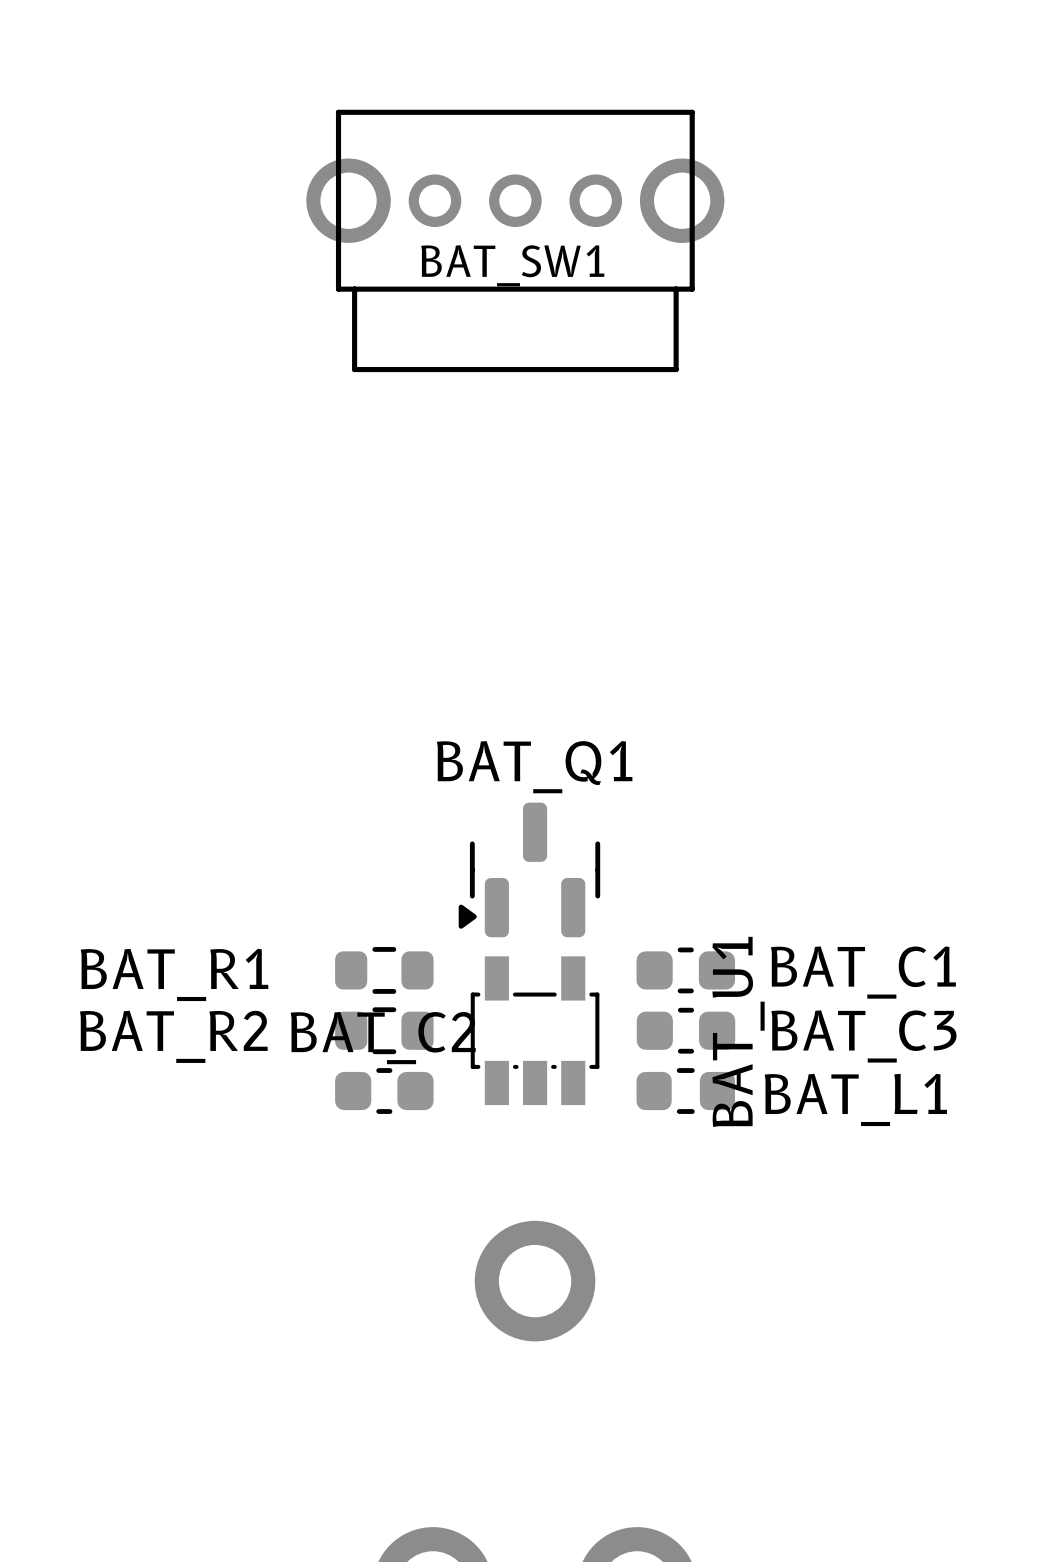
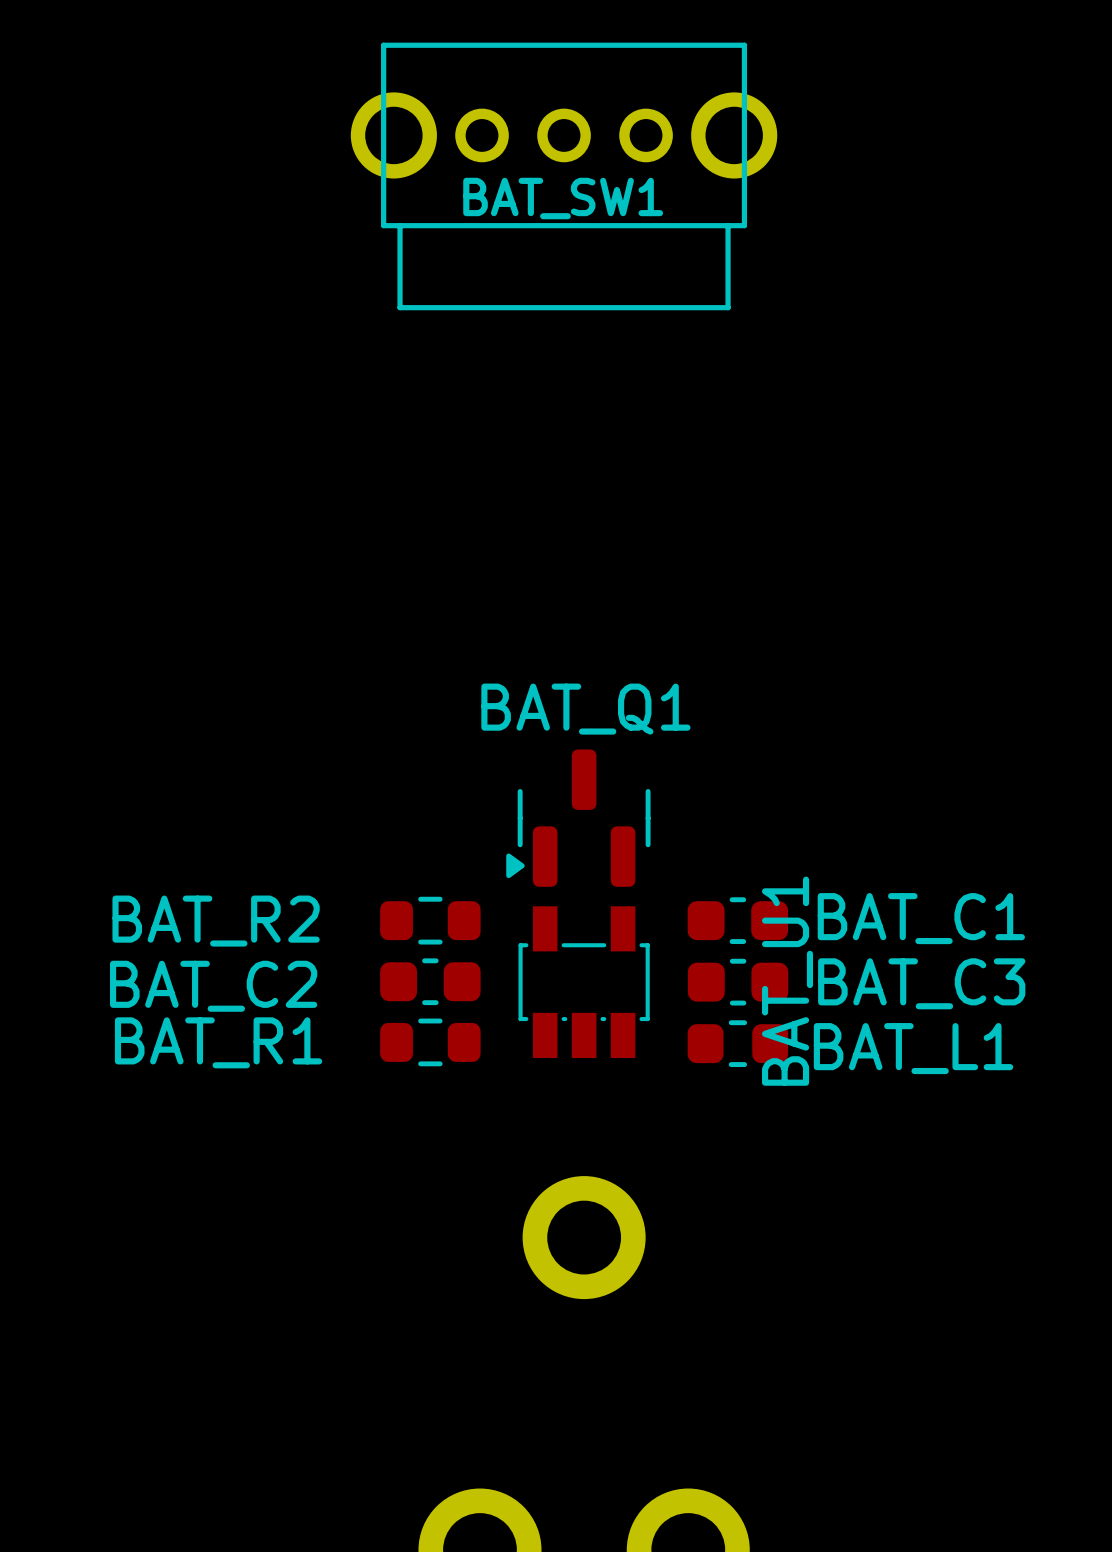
BAT_R1 name: BAT_R1 (174, 974) -> BAT_R2 (216, 921)
BAT_R2: (384, 1030) -> none
BAT_C2 name position: BAT_C2 (383, 1038) -> BAT_C2 (213, 986)
BAT_R1: none -> (430, 1042)
BAT_C2 position: (384, 1091) -> (430, 981)

